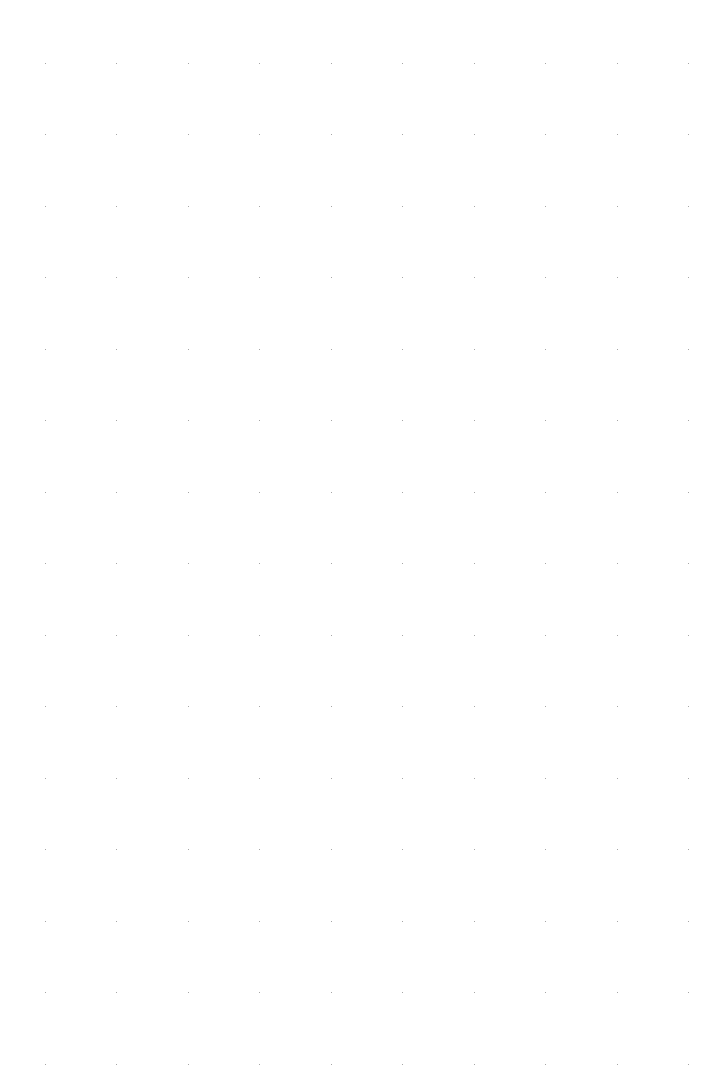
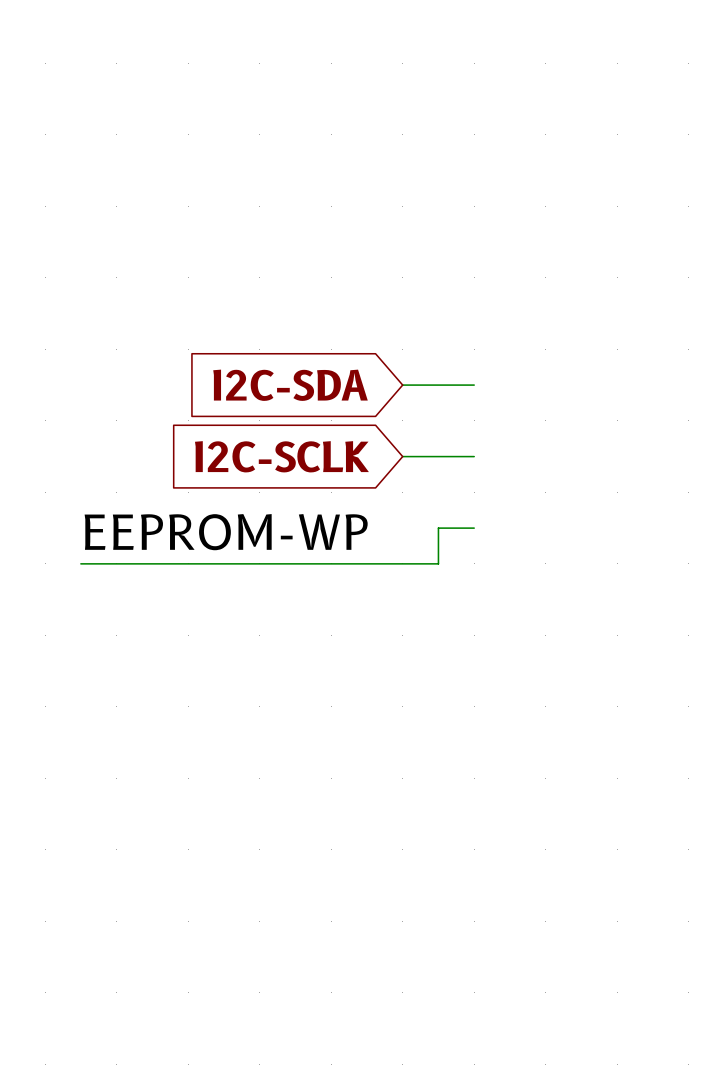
global label: none -> I2C-SDA (290, 385)
wire: none -> (402, 385) (474, 385)
global label: none -> I2C-SCLK (281, 456)
wire: none -> (402, 456) (474, 456)
wire: none -> (474, 528) (438, 528) (438, 563) (80, 563)
label: none -> EEPROM-WP (226, 532)

